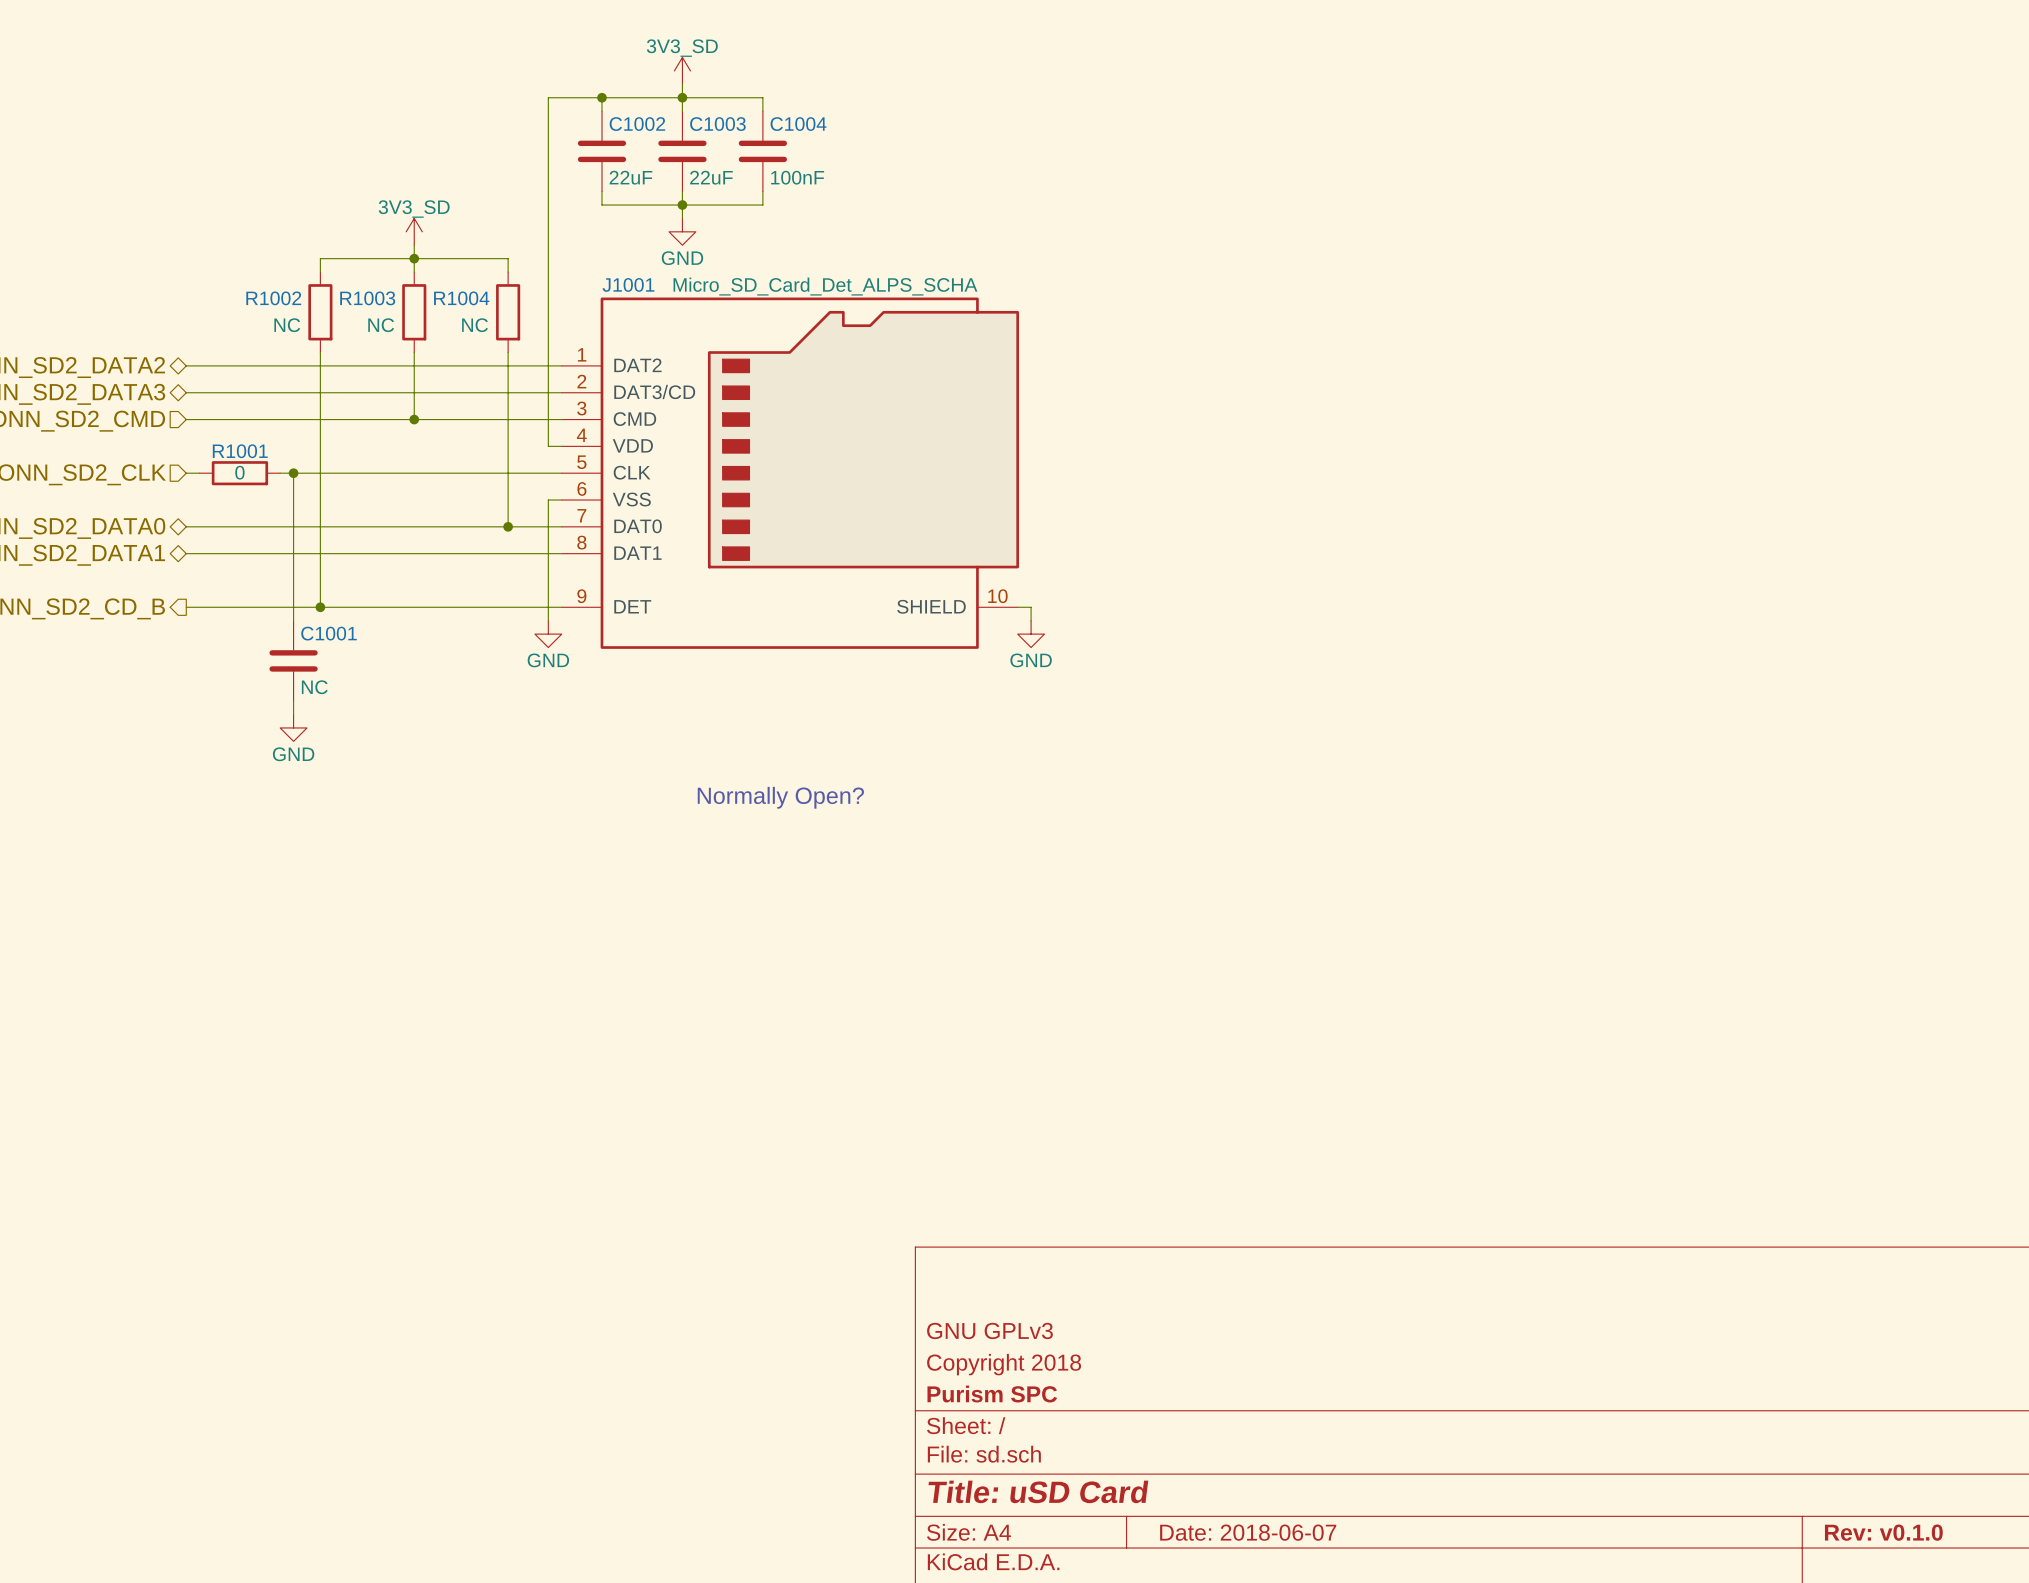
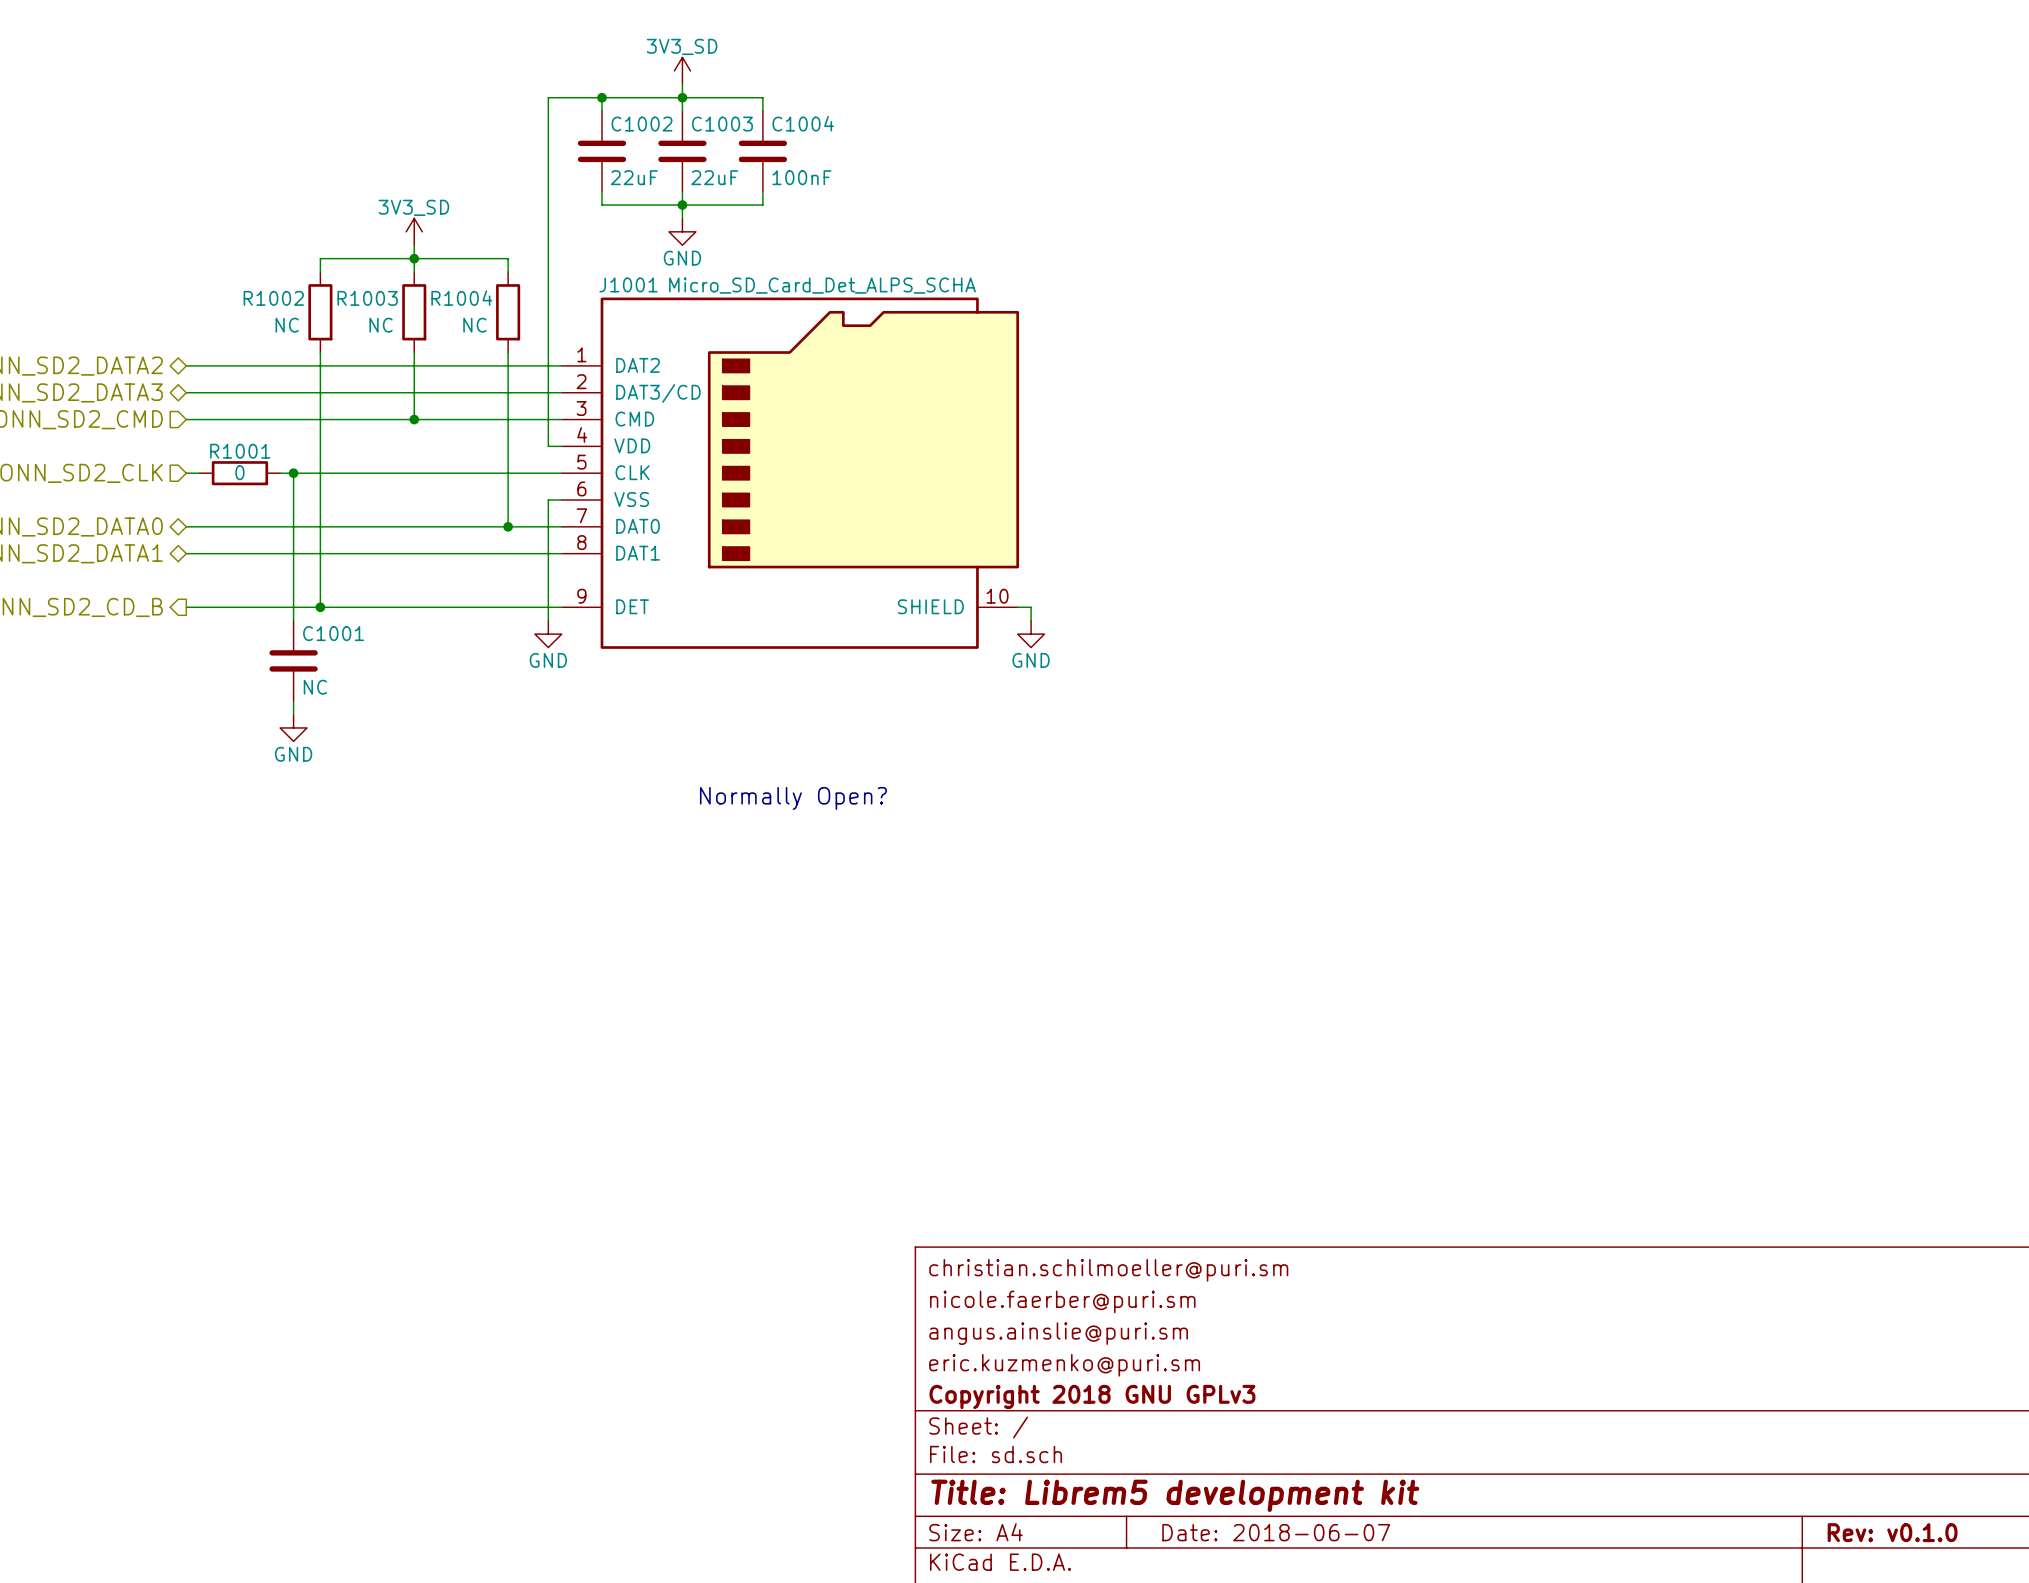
title block: none -> christian.schilmoeller@puri.sm (1108, 1270)
title block: none -> nicole.faerber@puri.sm (1062, 1301)
title block: GNU GPLv3 (989, 1330) -> angus.ainslie@puri.sm (1058, 1333)
title block: Copyright 2018 (1004, 1364) -> eric.kuzmenko@puri.sm (1064, 1365)
title block: Purism SPC (992, 1394) -> Copyright 2018 GNU GPLv3 (1092, 1396)
title block: Title: uSD Card (1038, 1491) -> Title: Librem5 development kit (1175, 1495)

